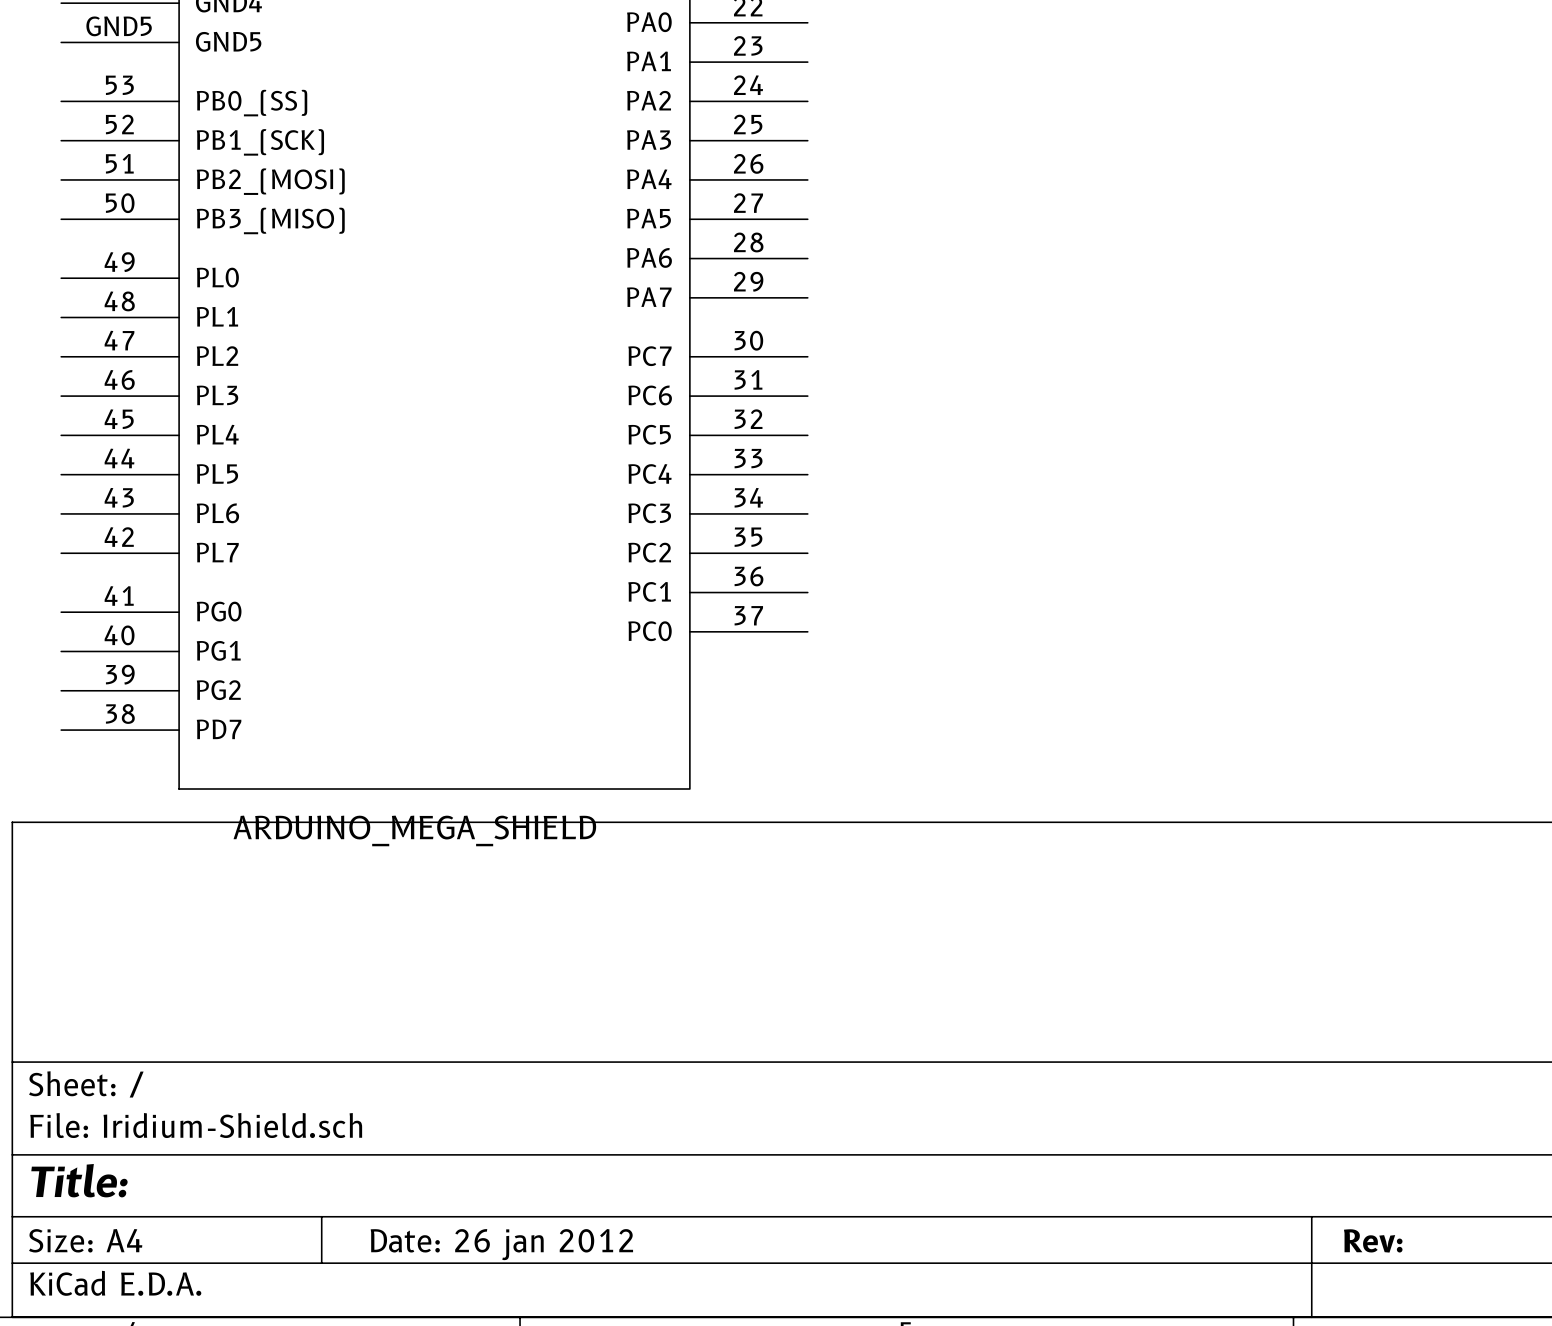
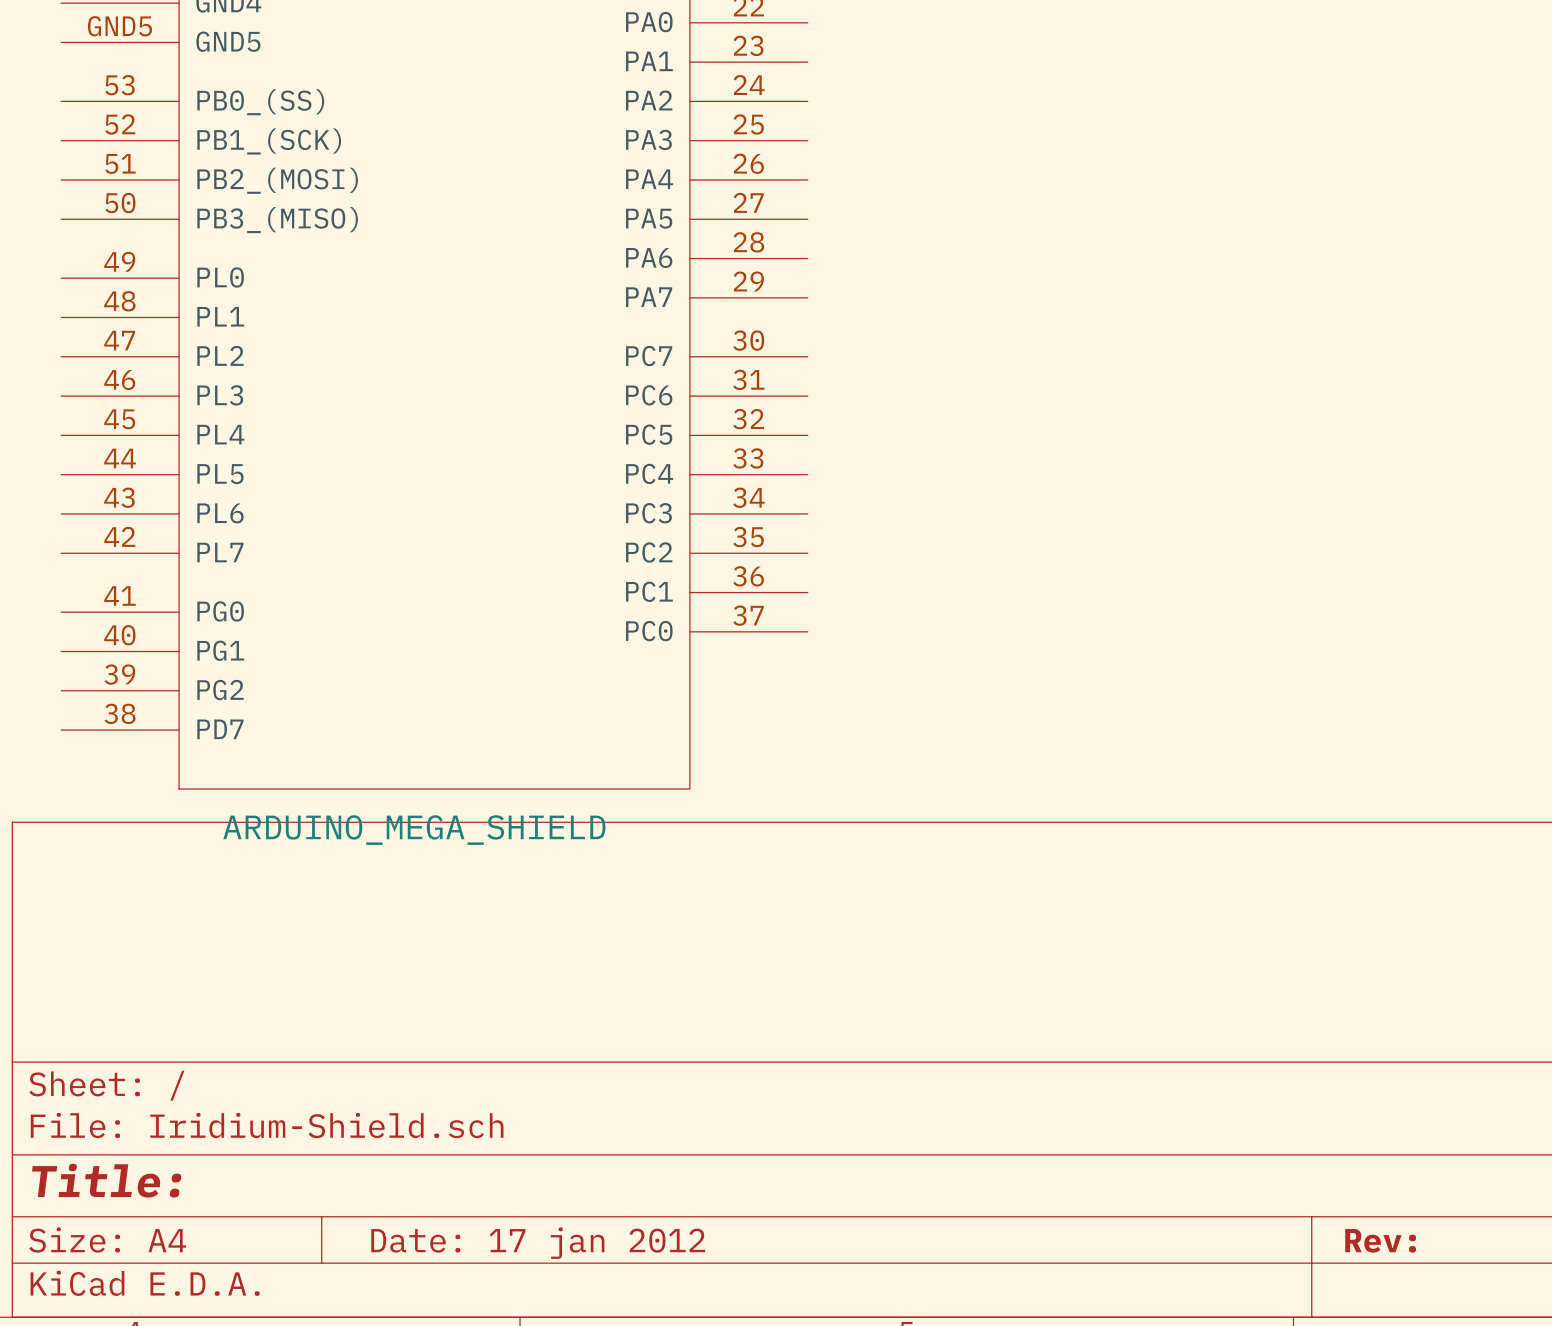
title block: Date: 26 jan 2012 (501, 1244) -> Date: 17 jan 2012 (538, 1243)

